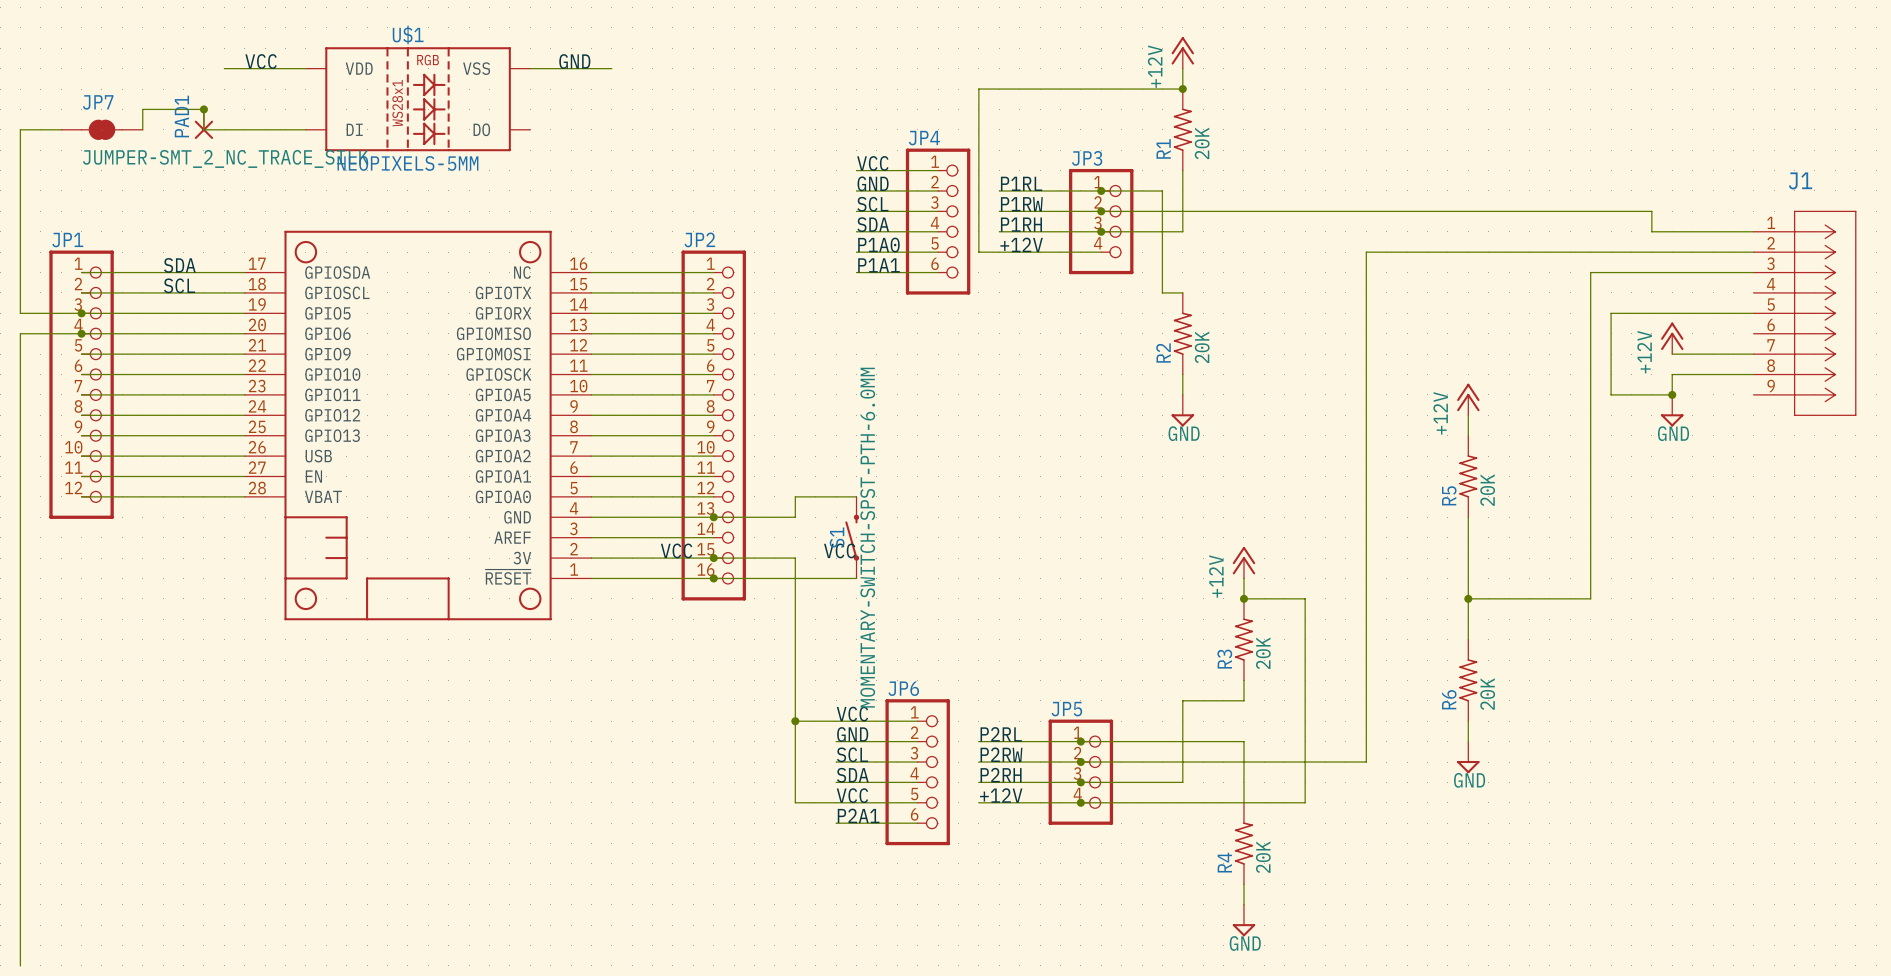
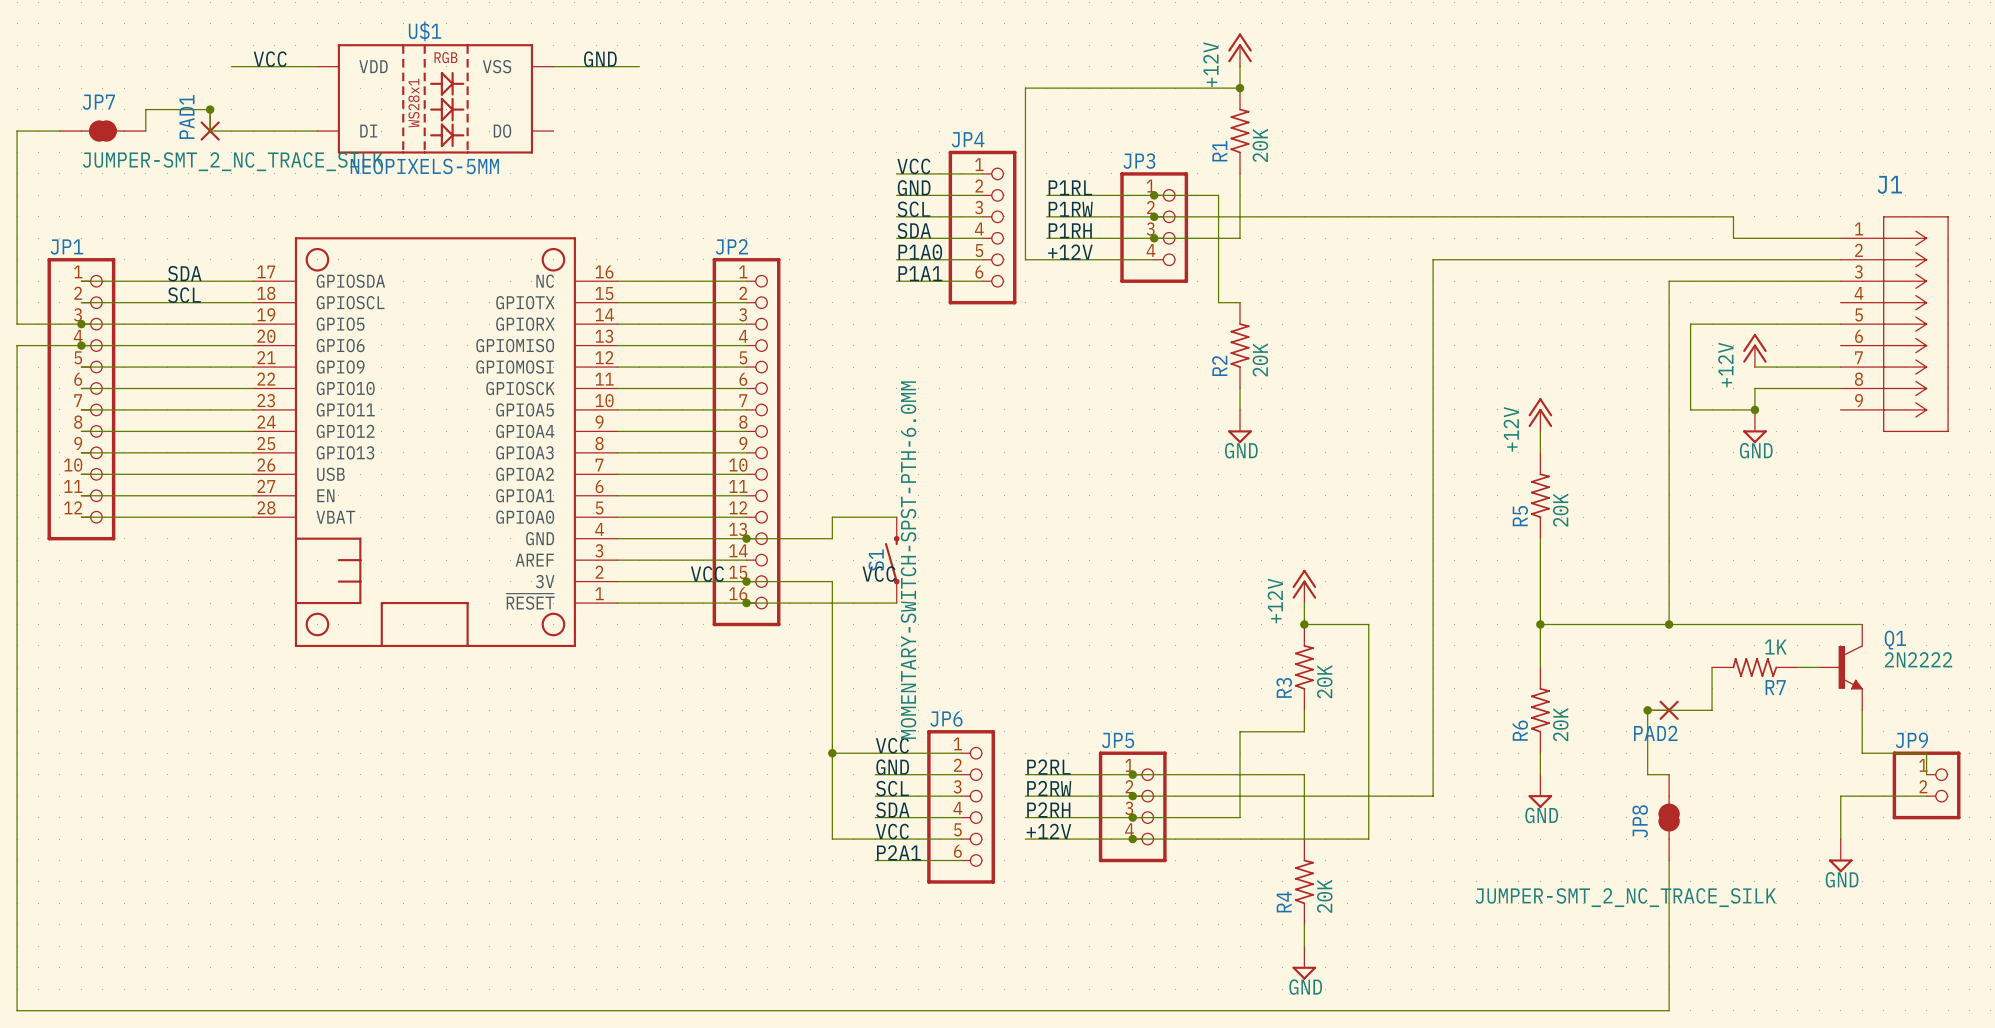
wire: none -> (1669, 624) (1862, 624)
junction: none -> (1669, 624)
wire: none -> (1712, 667) (1712, 710) (1647, 710) (1647, 774) (1669, 774)
R7: none -> 1K (1754, 667)
wire: none -> (1797, 667) (1819, 667)
Q1: none -> 2N2222 (1841, 667)
junction: none -> (1647, 710)
PAD2: none -> (1663, 710)
wire: none -> (1862, 710) (1862, 753) (1926, 753) (1926, 774)
JP9: none -> (1926, 785)
wire: none -> (1926, 796) (1840, 796) (1840, 839)
JP8: none -> JUMPER-SMT_2_NC_TRACE_SILK (1669, 817)
power symbol: none -> GND (1840, 855)
wire: none -> (1669, 860) (1669, 1010) (17, 1010)

